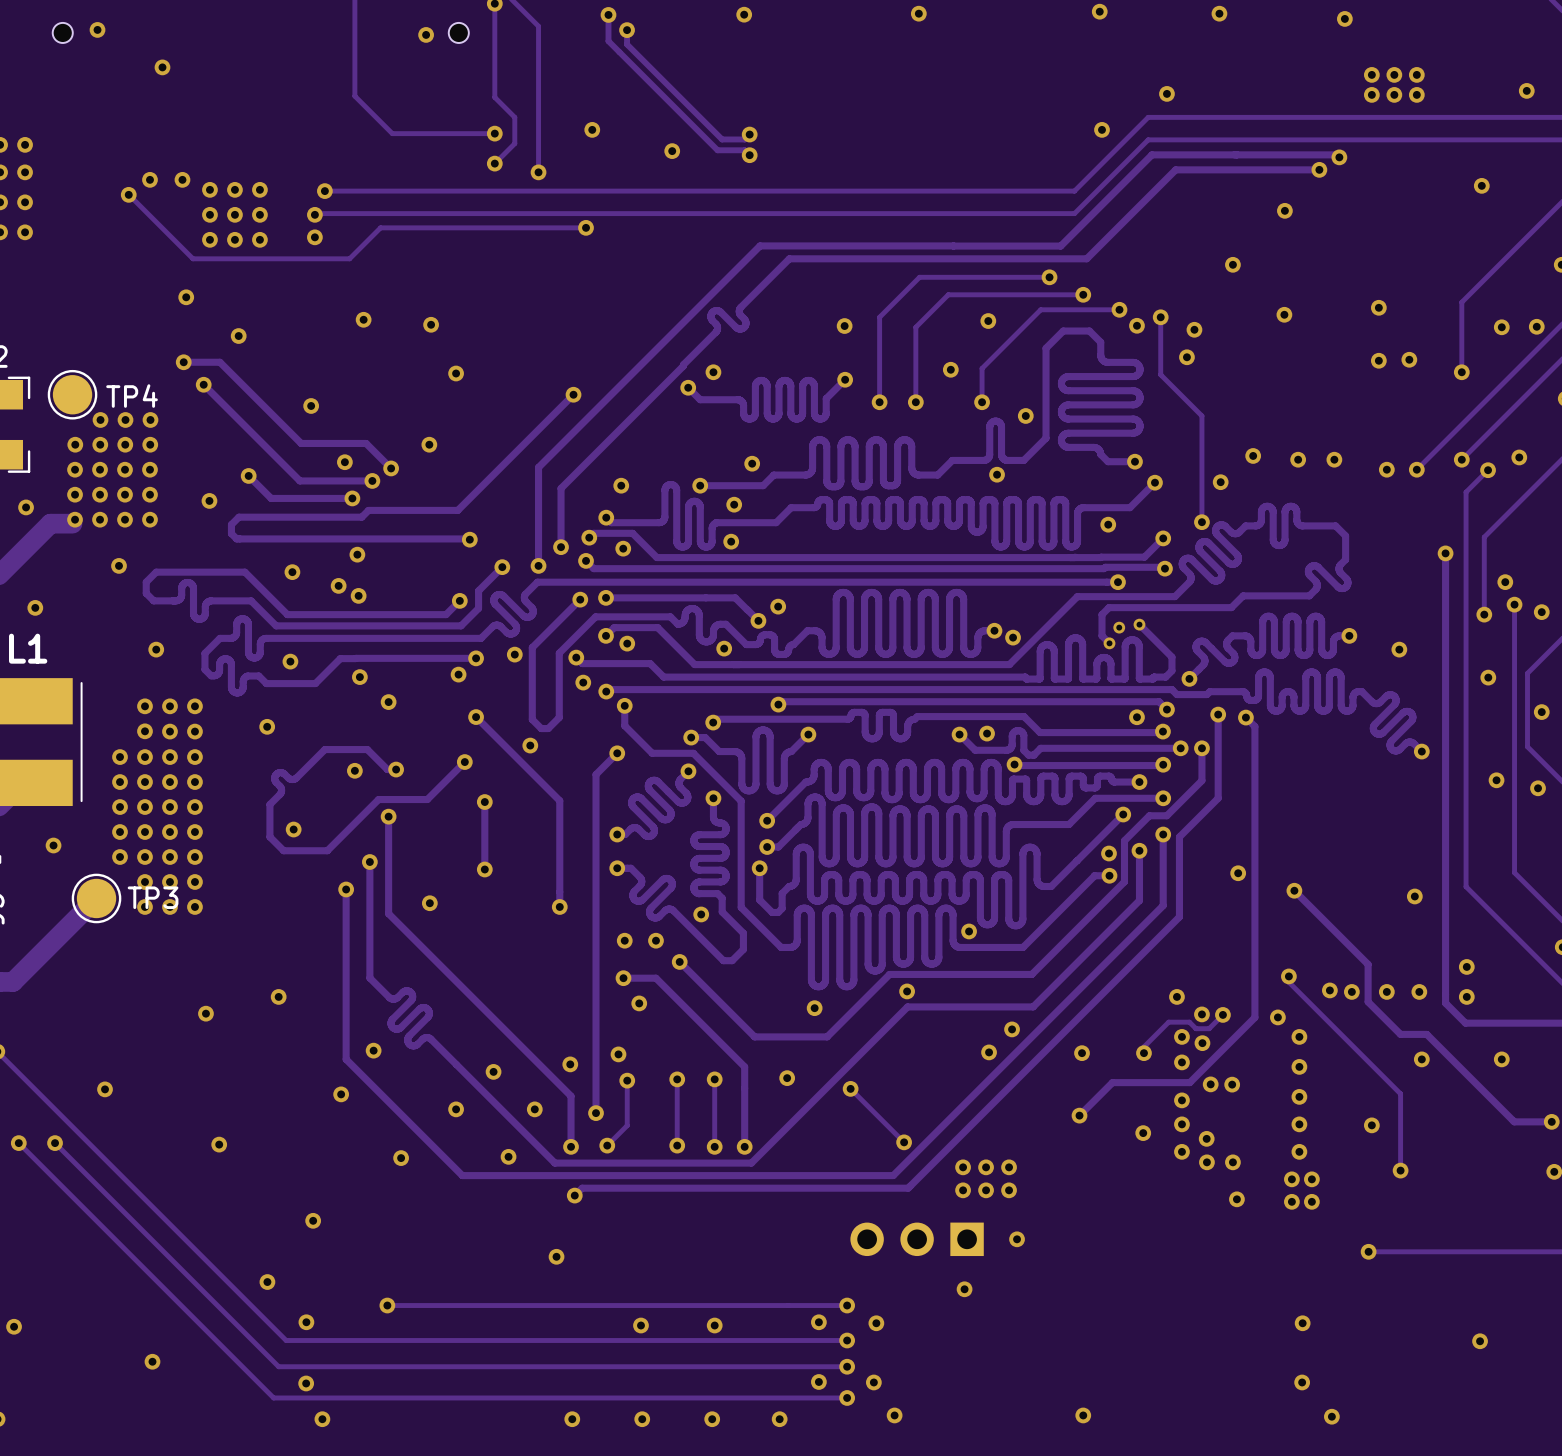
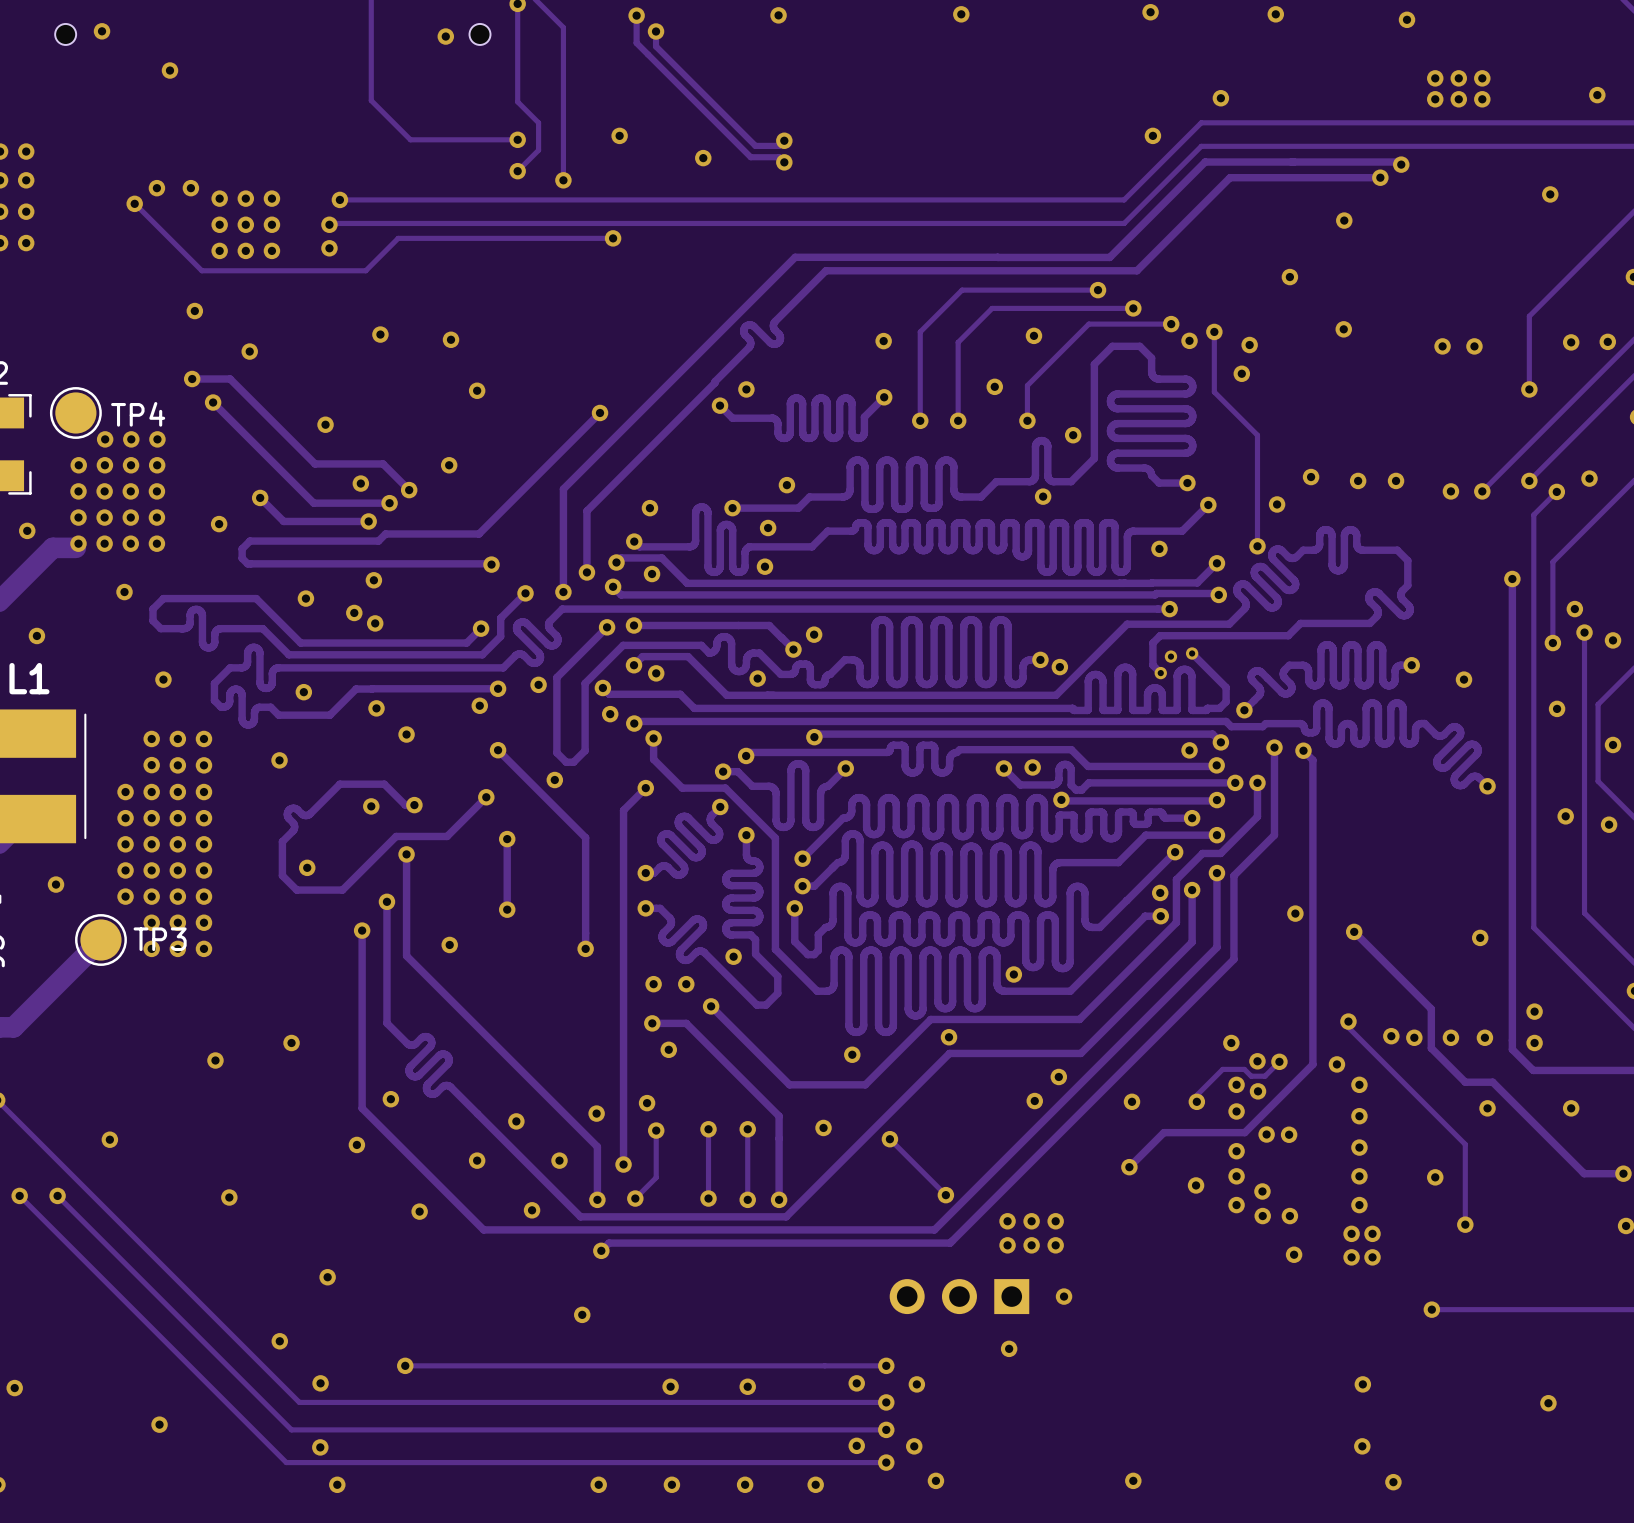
via: (1378, 307) -> none
via: none -> (1442, 346)
via: none -> (1474, 346)
via: (1409, 359) -> none
via: (1378, 360) -> none

